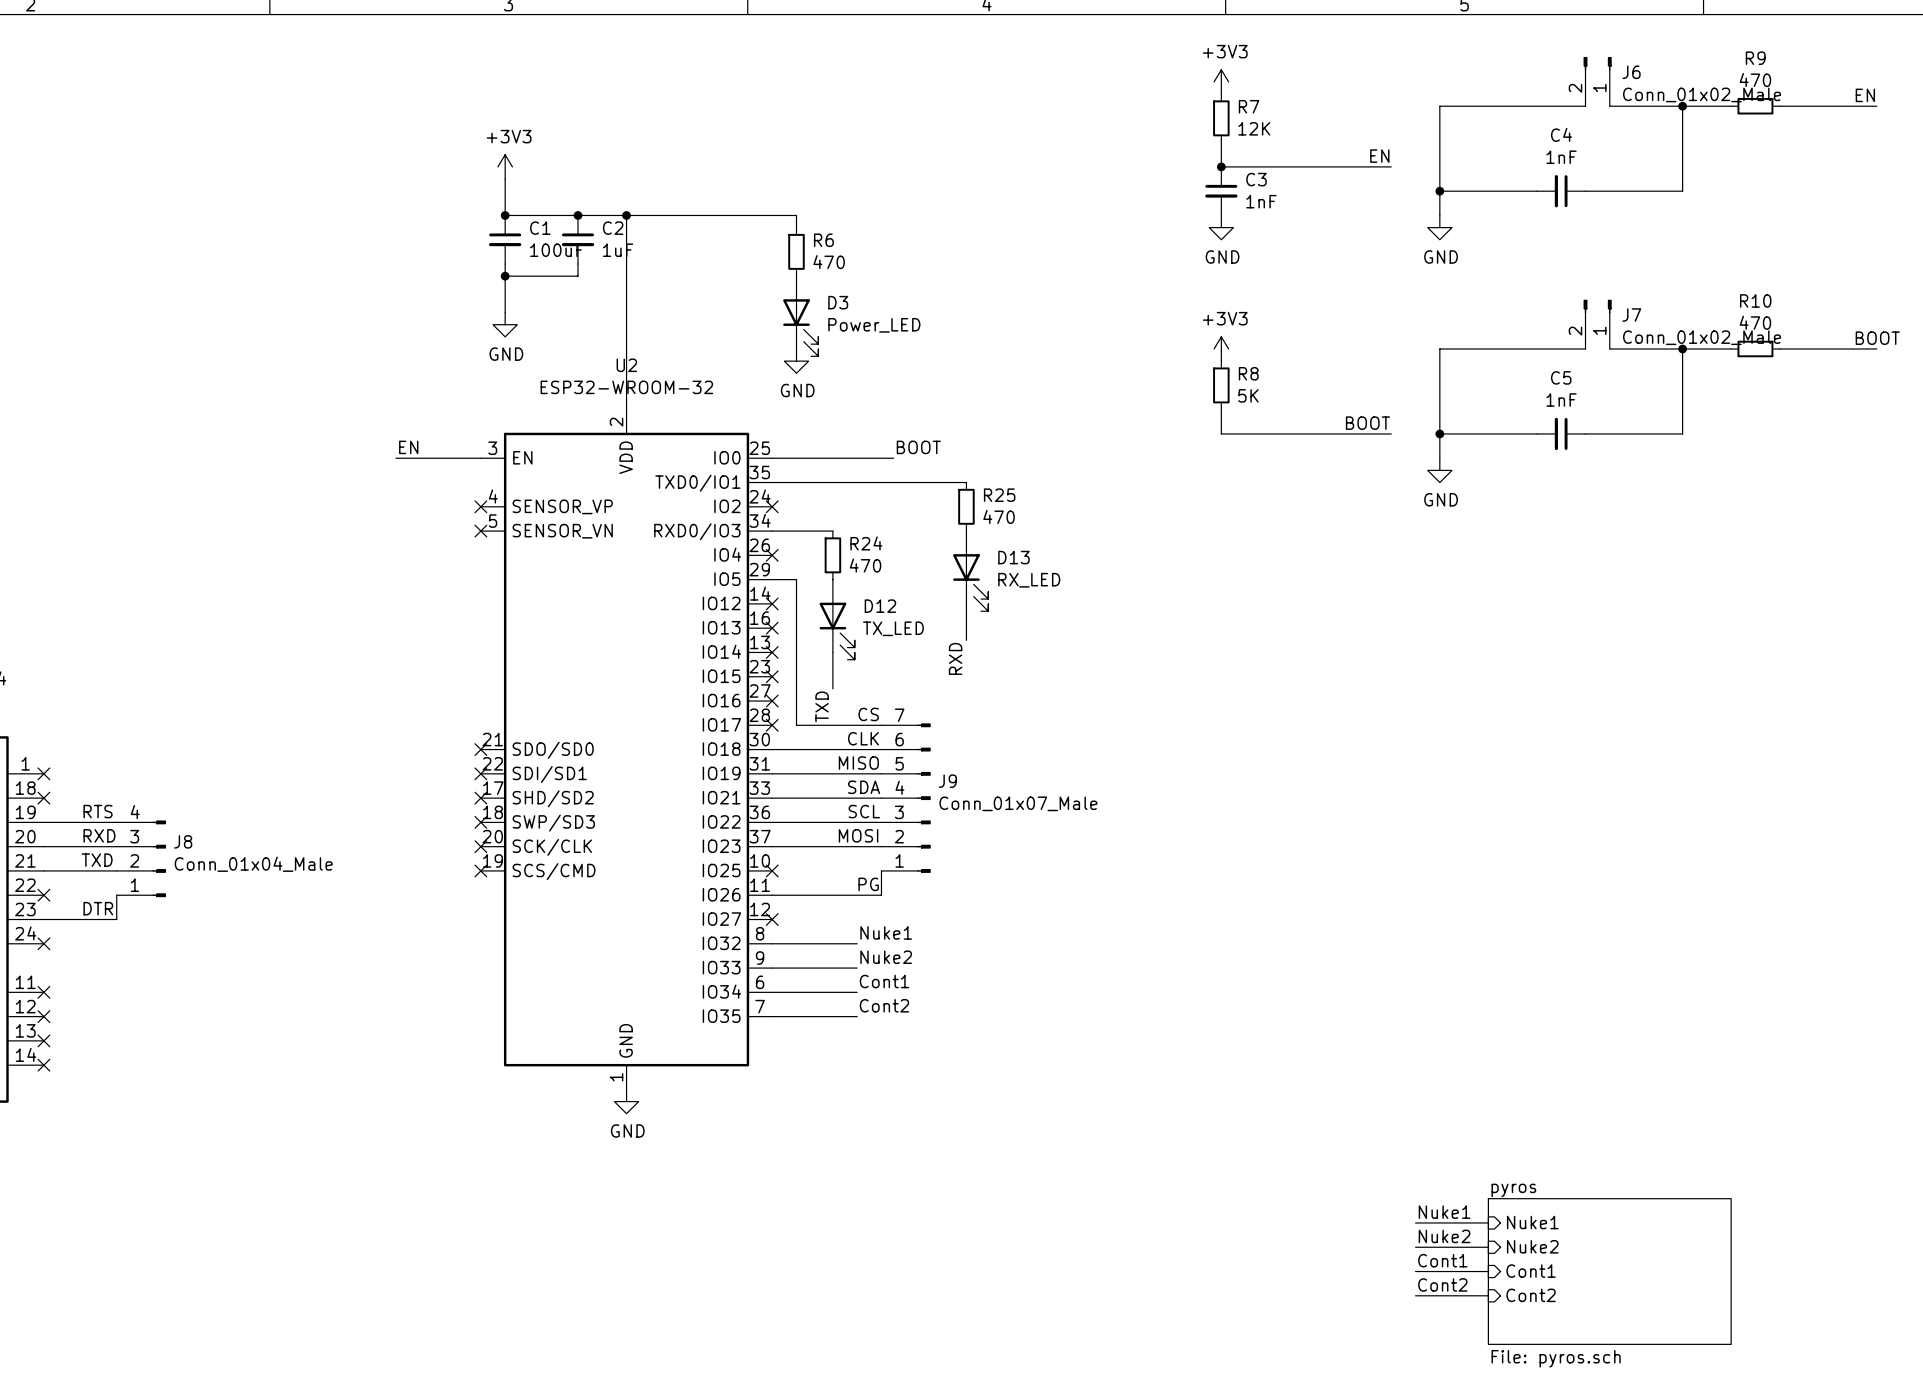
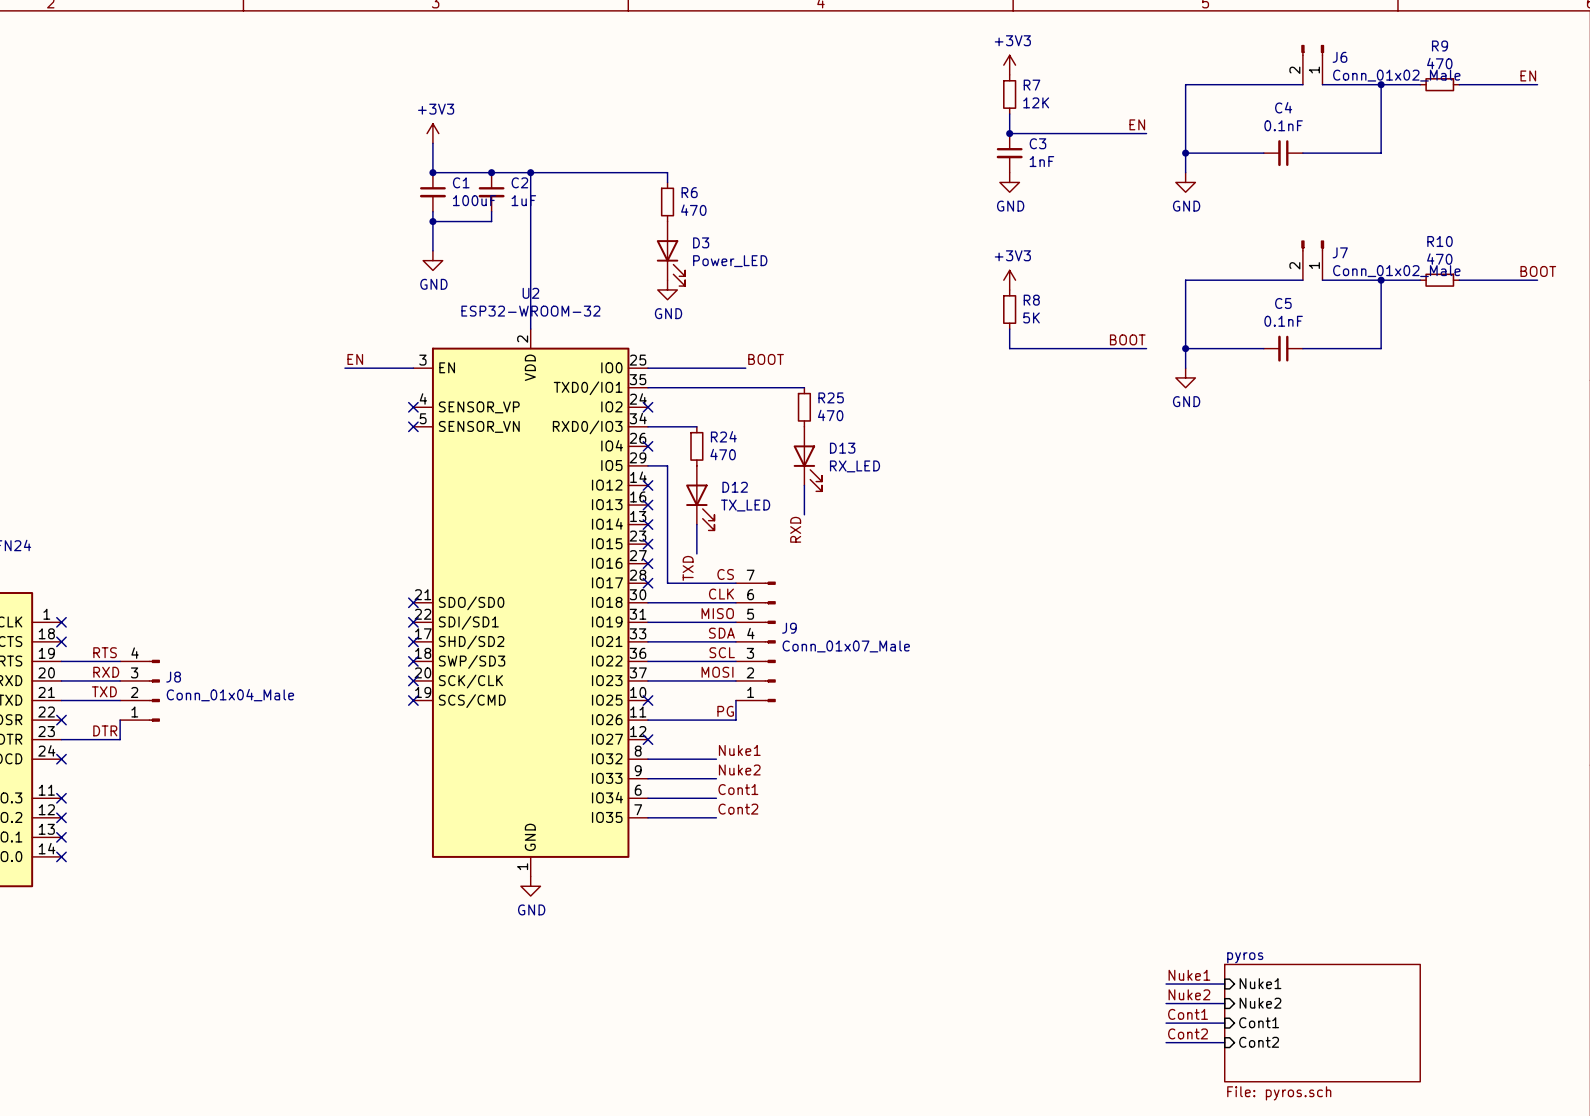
C4 value: 1nF (1561, 157) -> 0.1nF (1283, 125)
C5 value: 1nF (1561, 400) -> 0.1nF (1283, 321)

